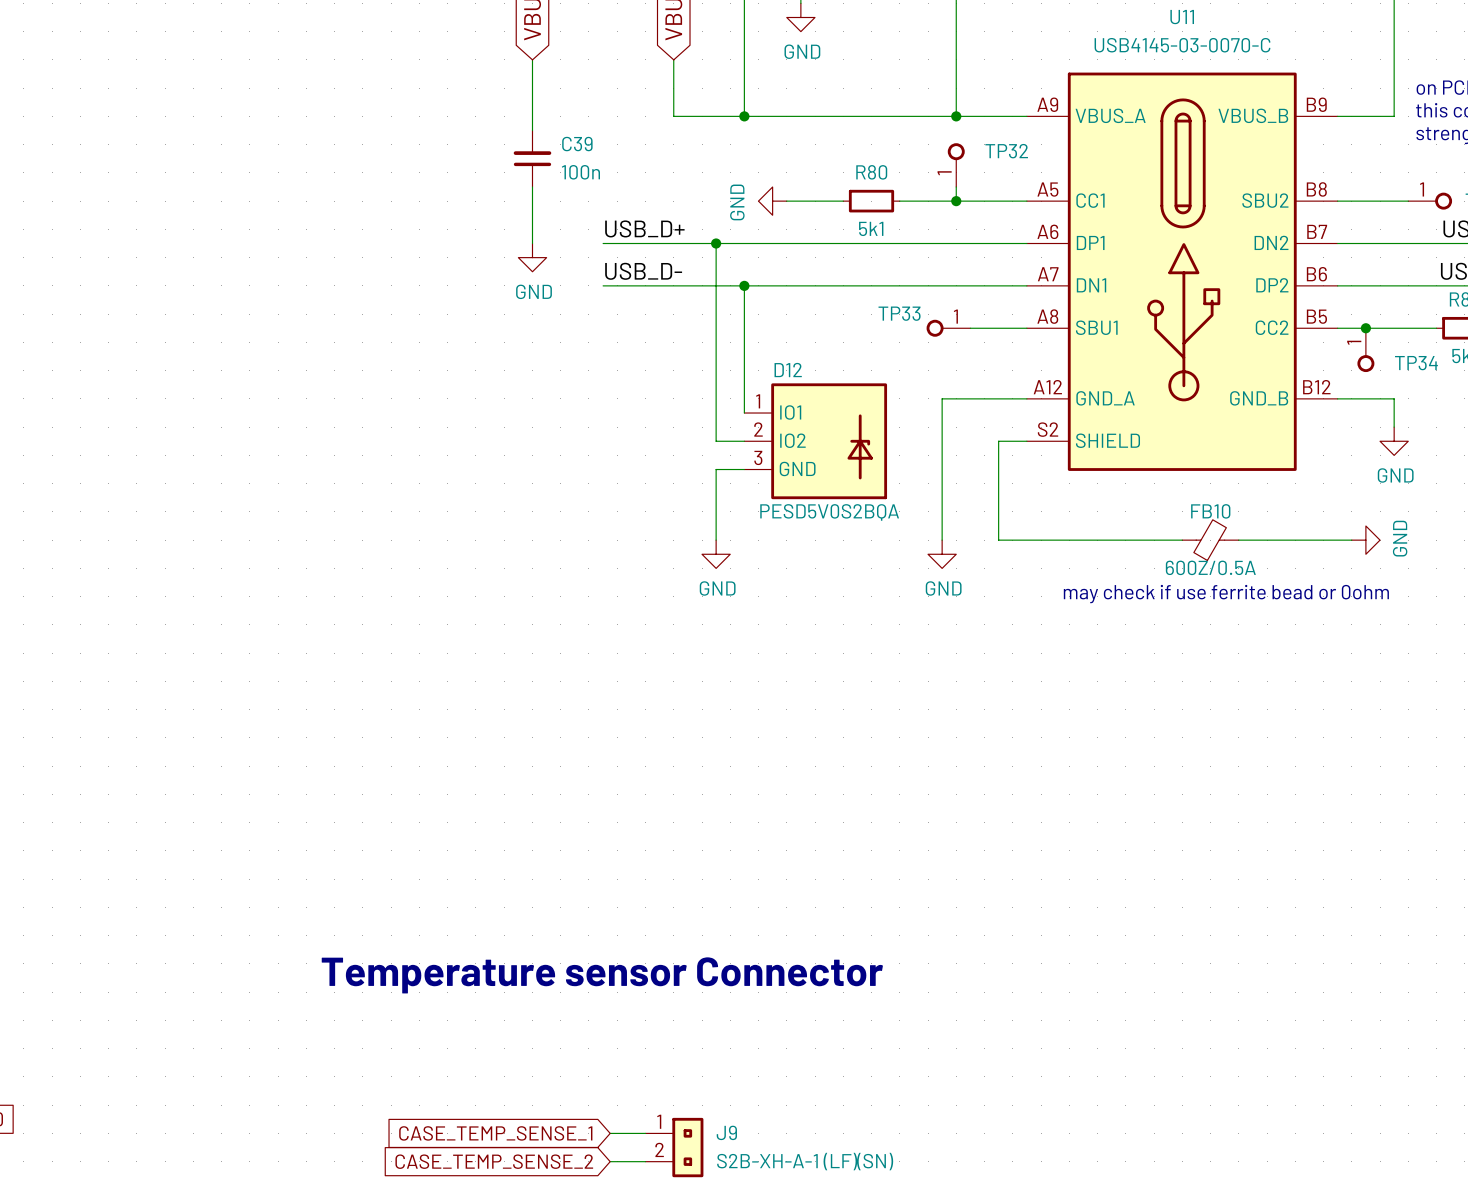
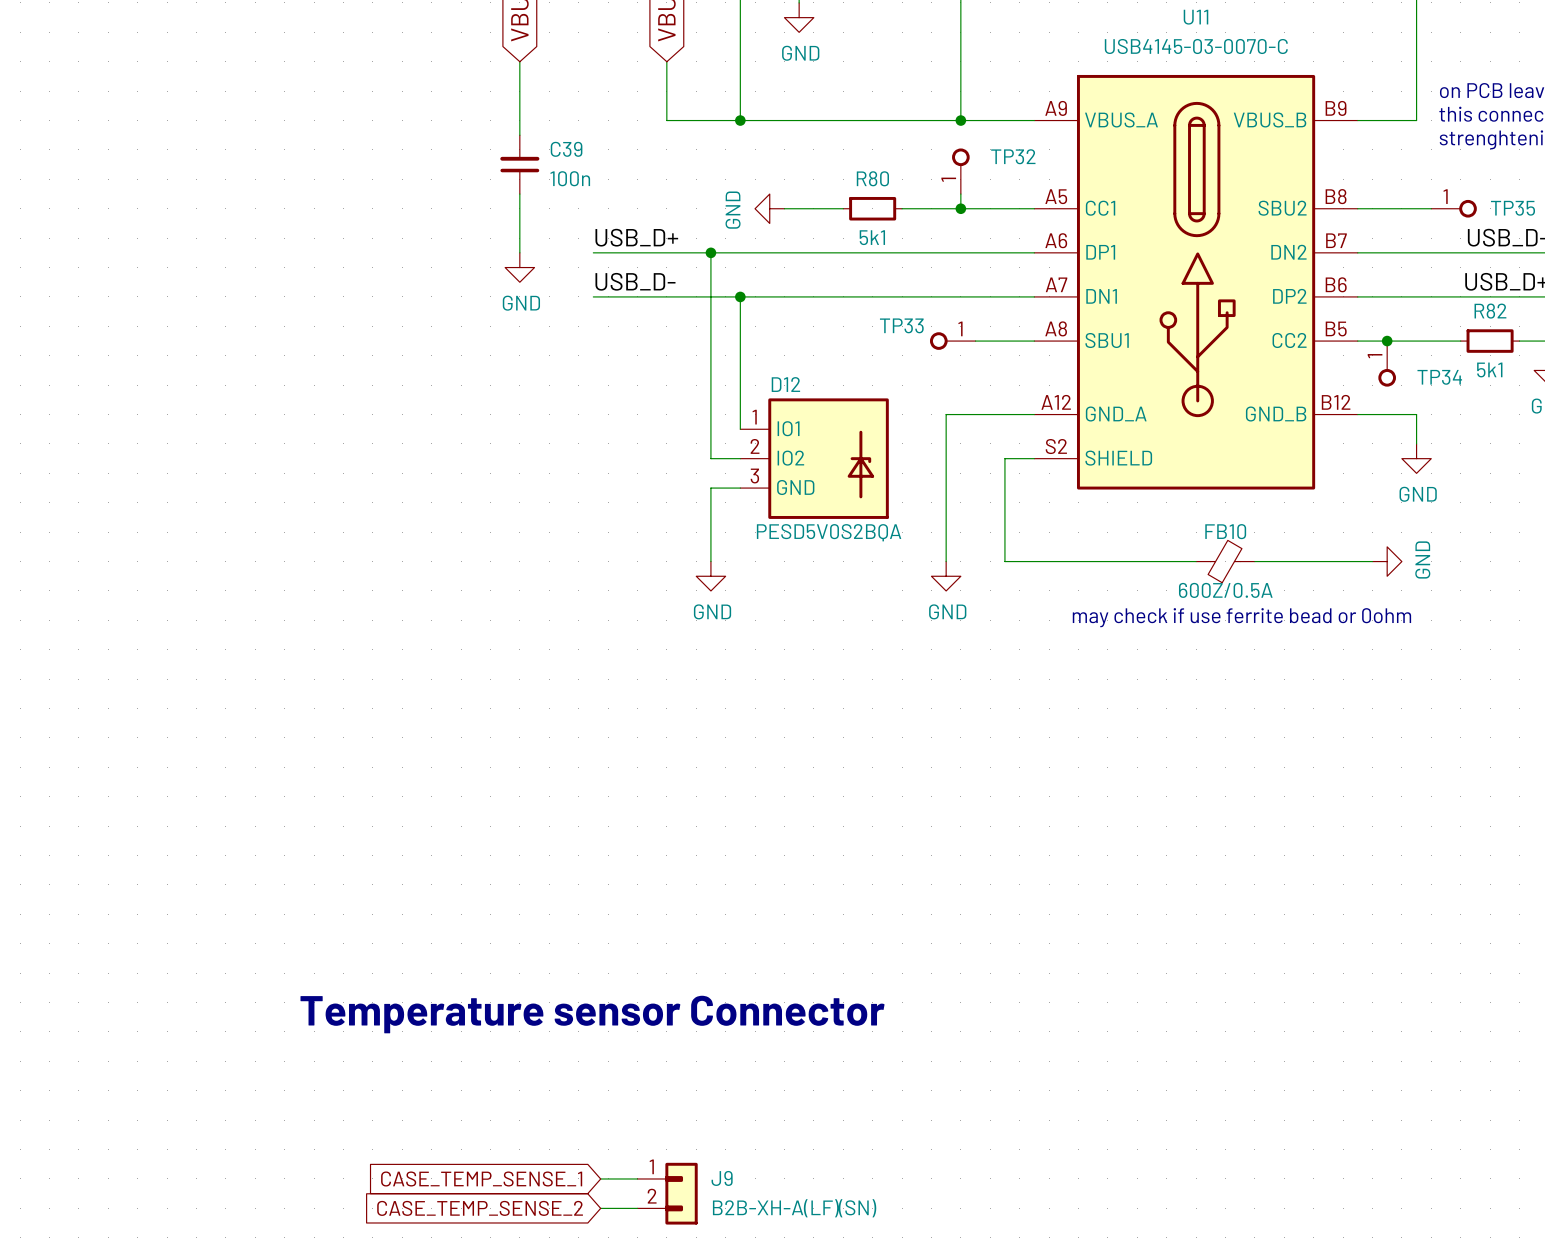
J9 symbol: [645, 1117, 704, 1178] -> [637, 1162, 698, 1225]
J9 text: S2B-XH-A-1 (LF)(SN) (805, 1161) -> B2B-XH-A(LF)(SN) (794, 1208)

